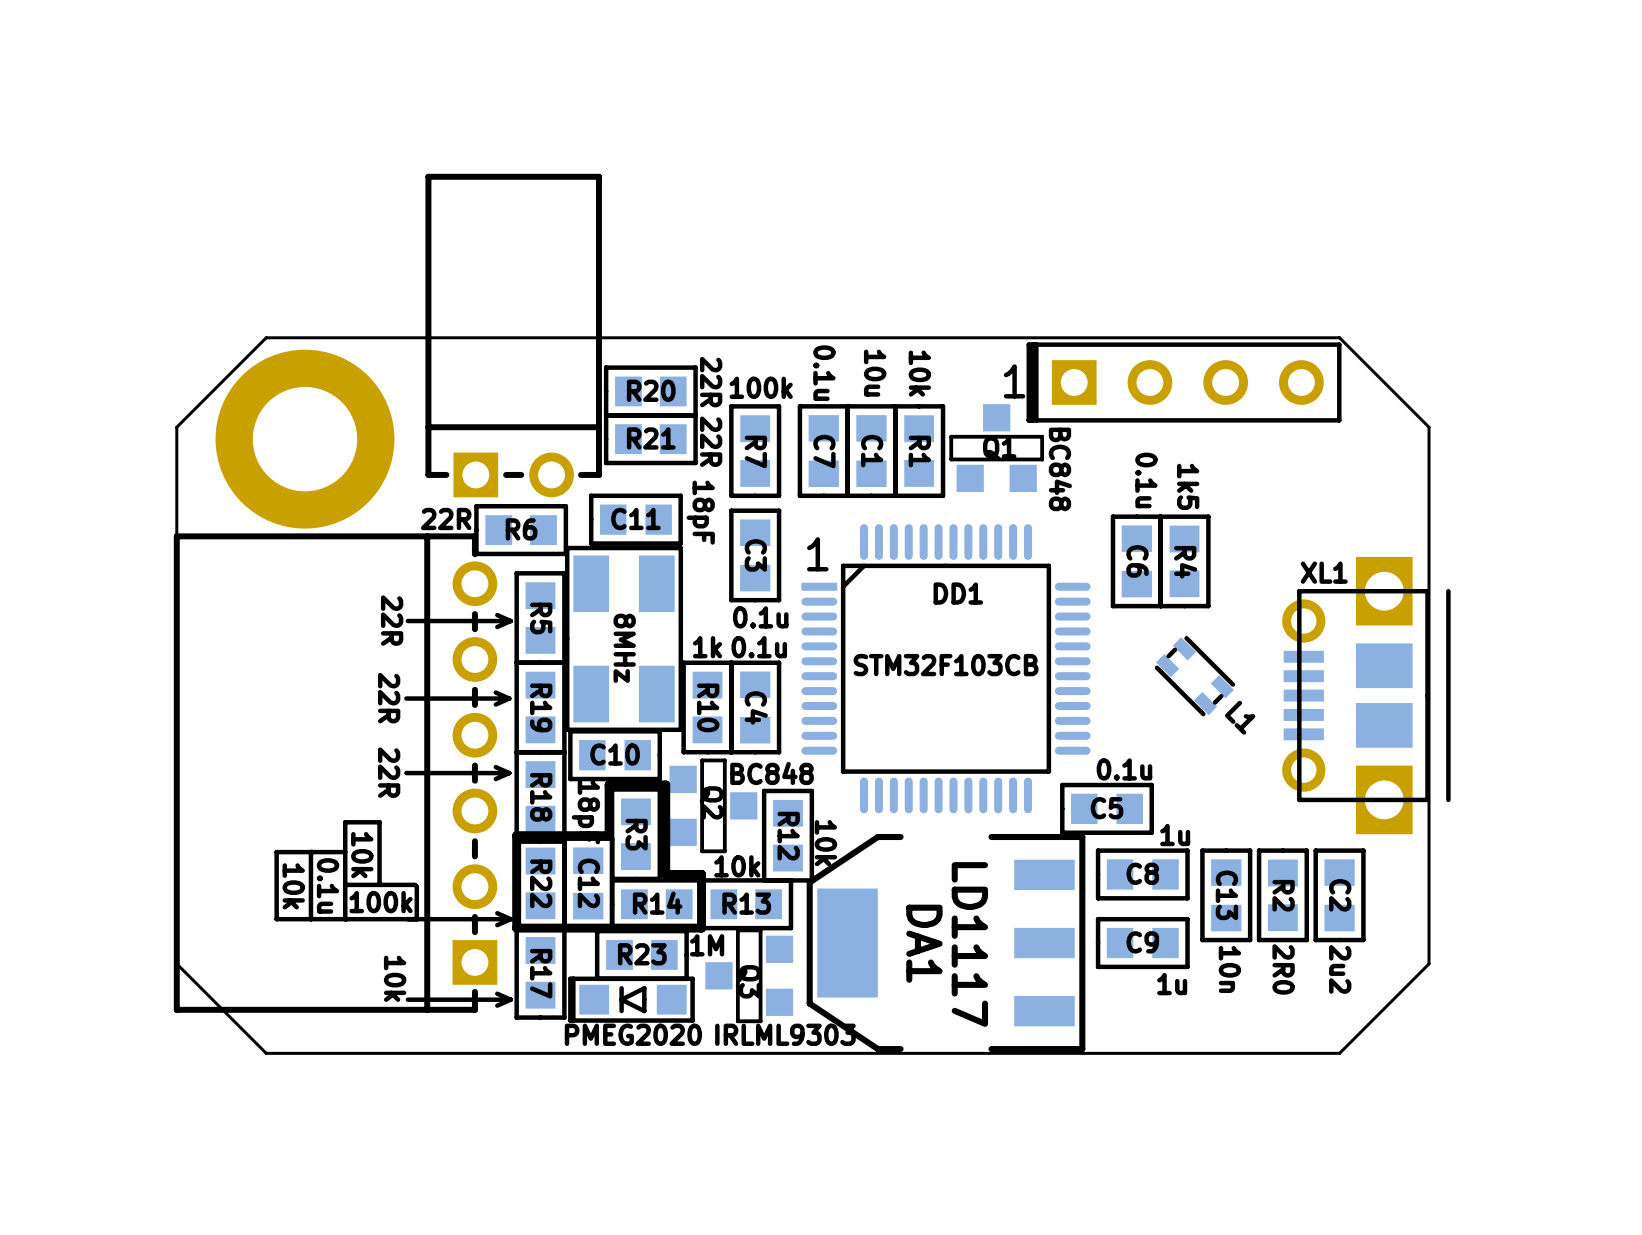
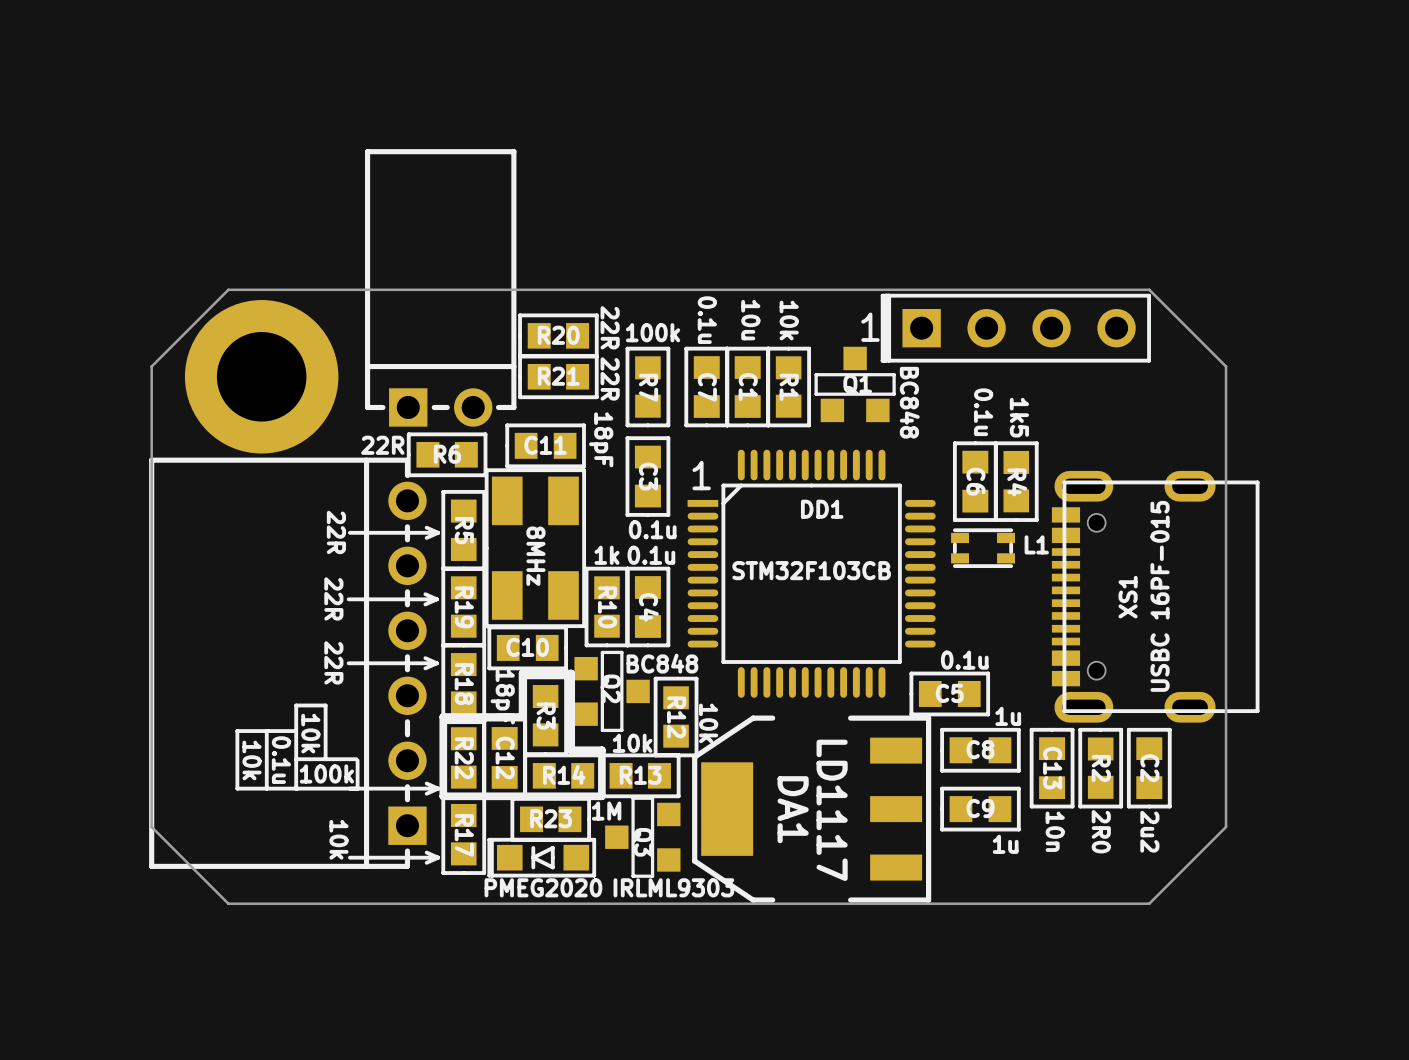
L1 rotation: 0° (1194, 676) -> 45° counterclockwise (983, 548)
L1 position: (1194, 676) -> (983, 548)
XS1: none -> USBC 16PF-015 (1155, 596)
XL1: (1366, 695) -> none

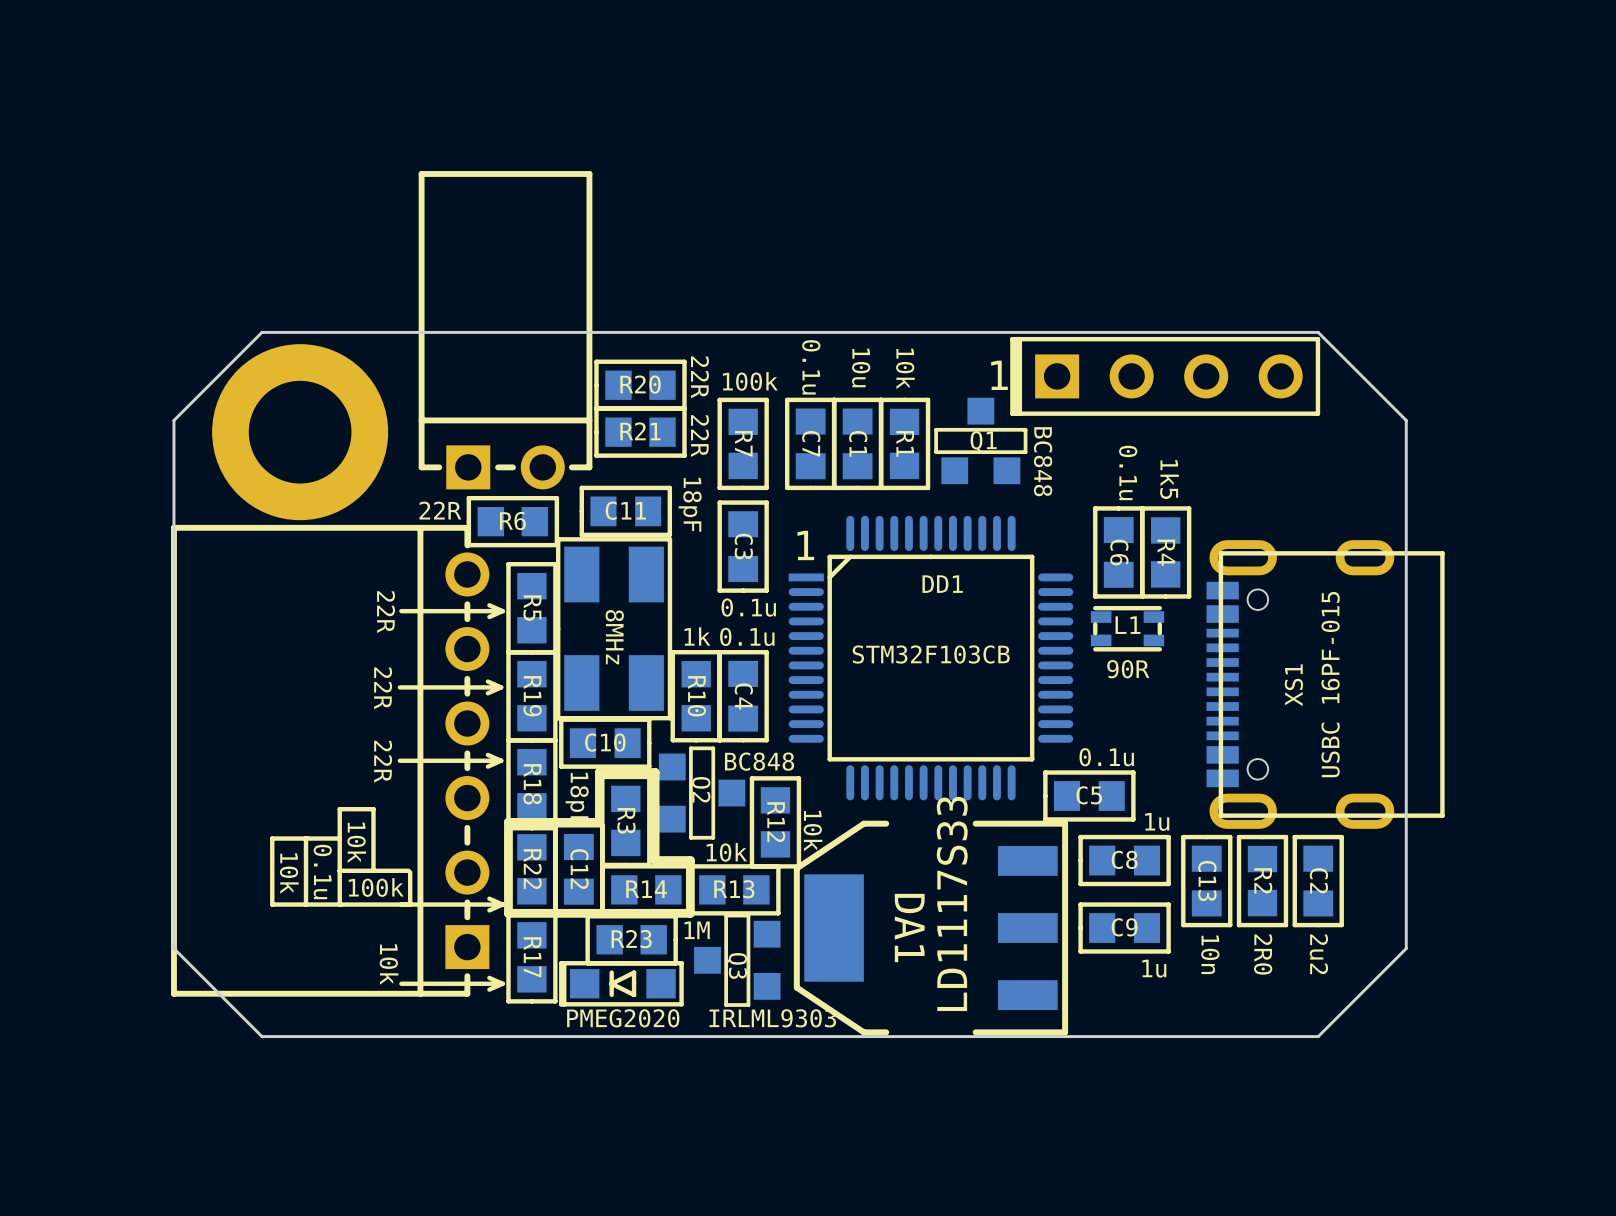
L1 name position: L1 (1036, 544) -> L1 (1127, 625)
L1 value: none -> 90R (1128, 669)
DA1 value: LD1117 (832, 810) -> LD1117S33 (952, 903)

